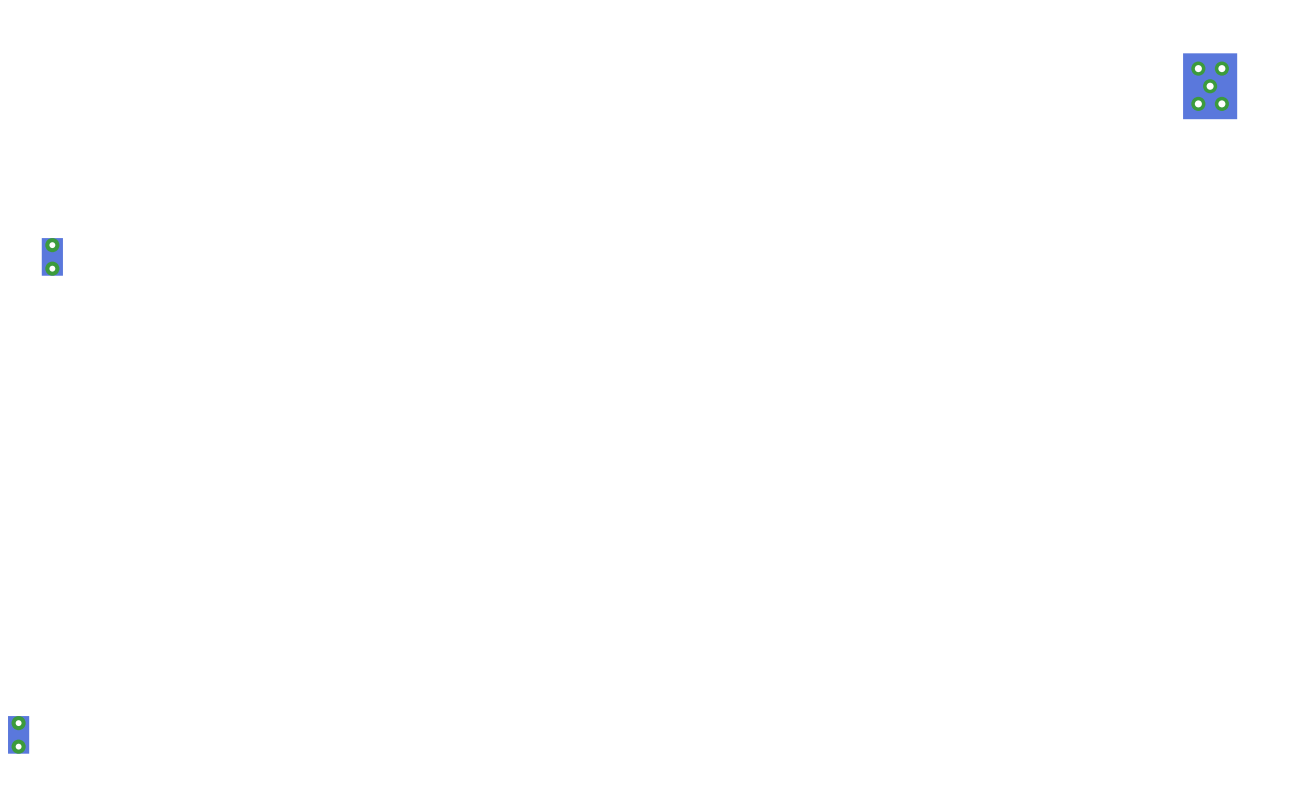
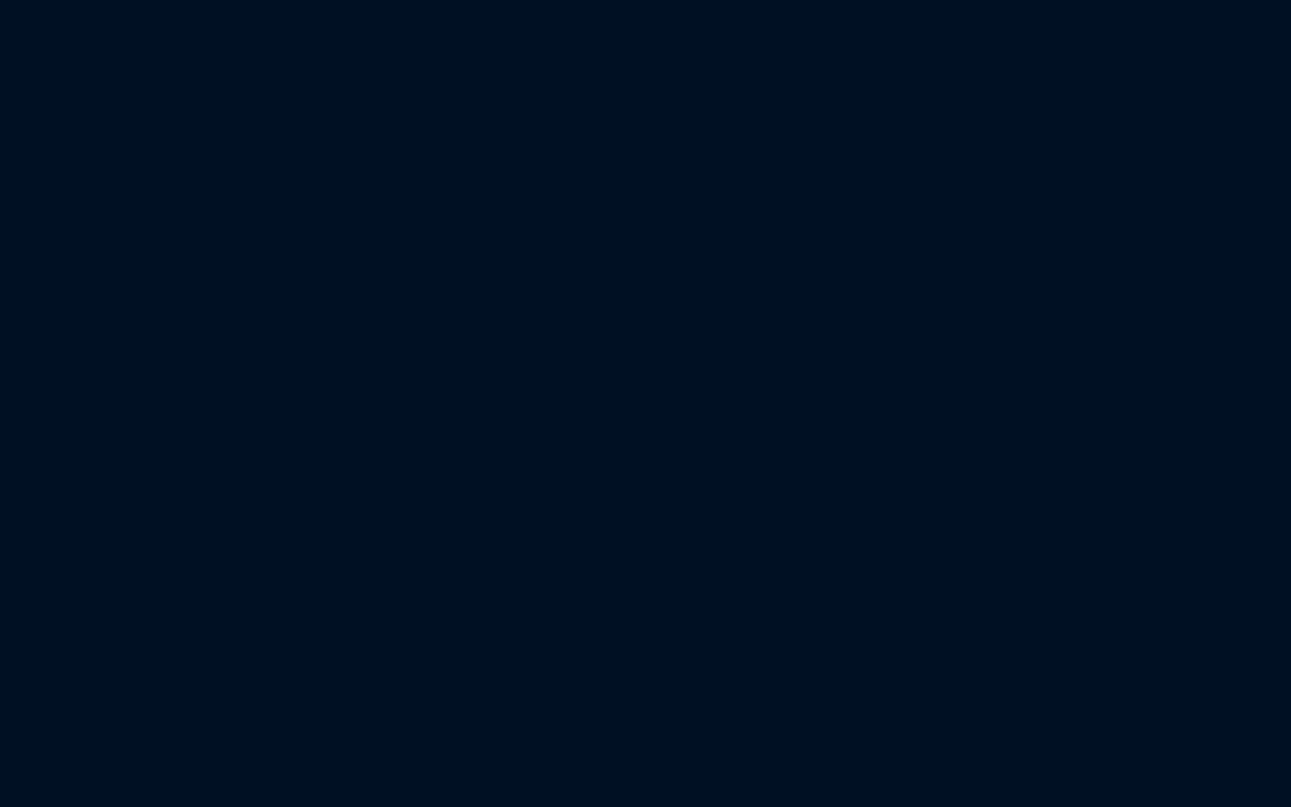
part: (1210, 86) -> none
part: (52, 256) -> none
part: (18, 734) -> none

